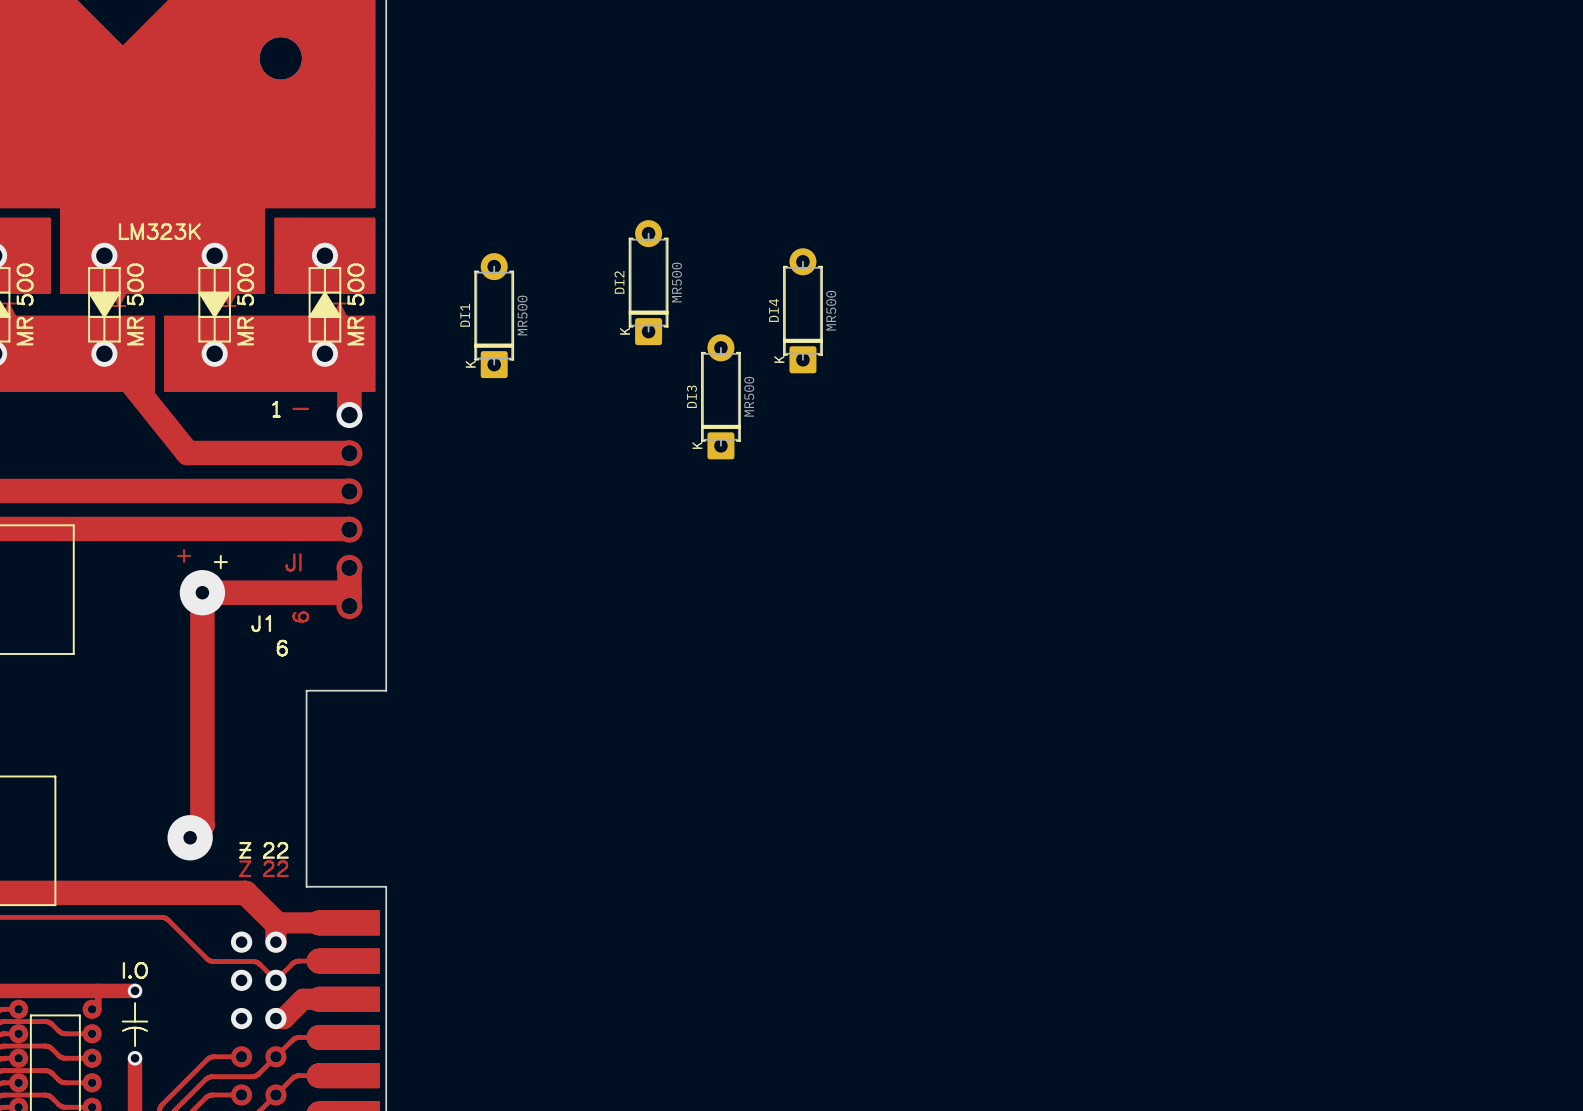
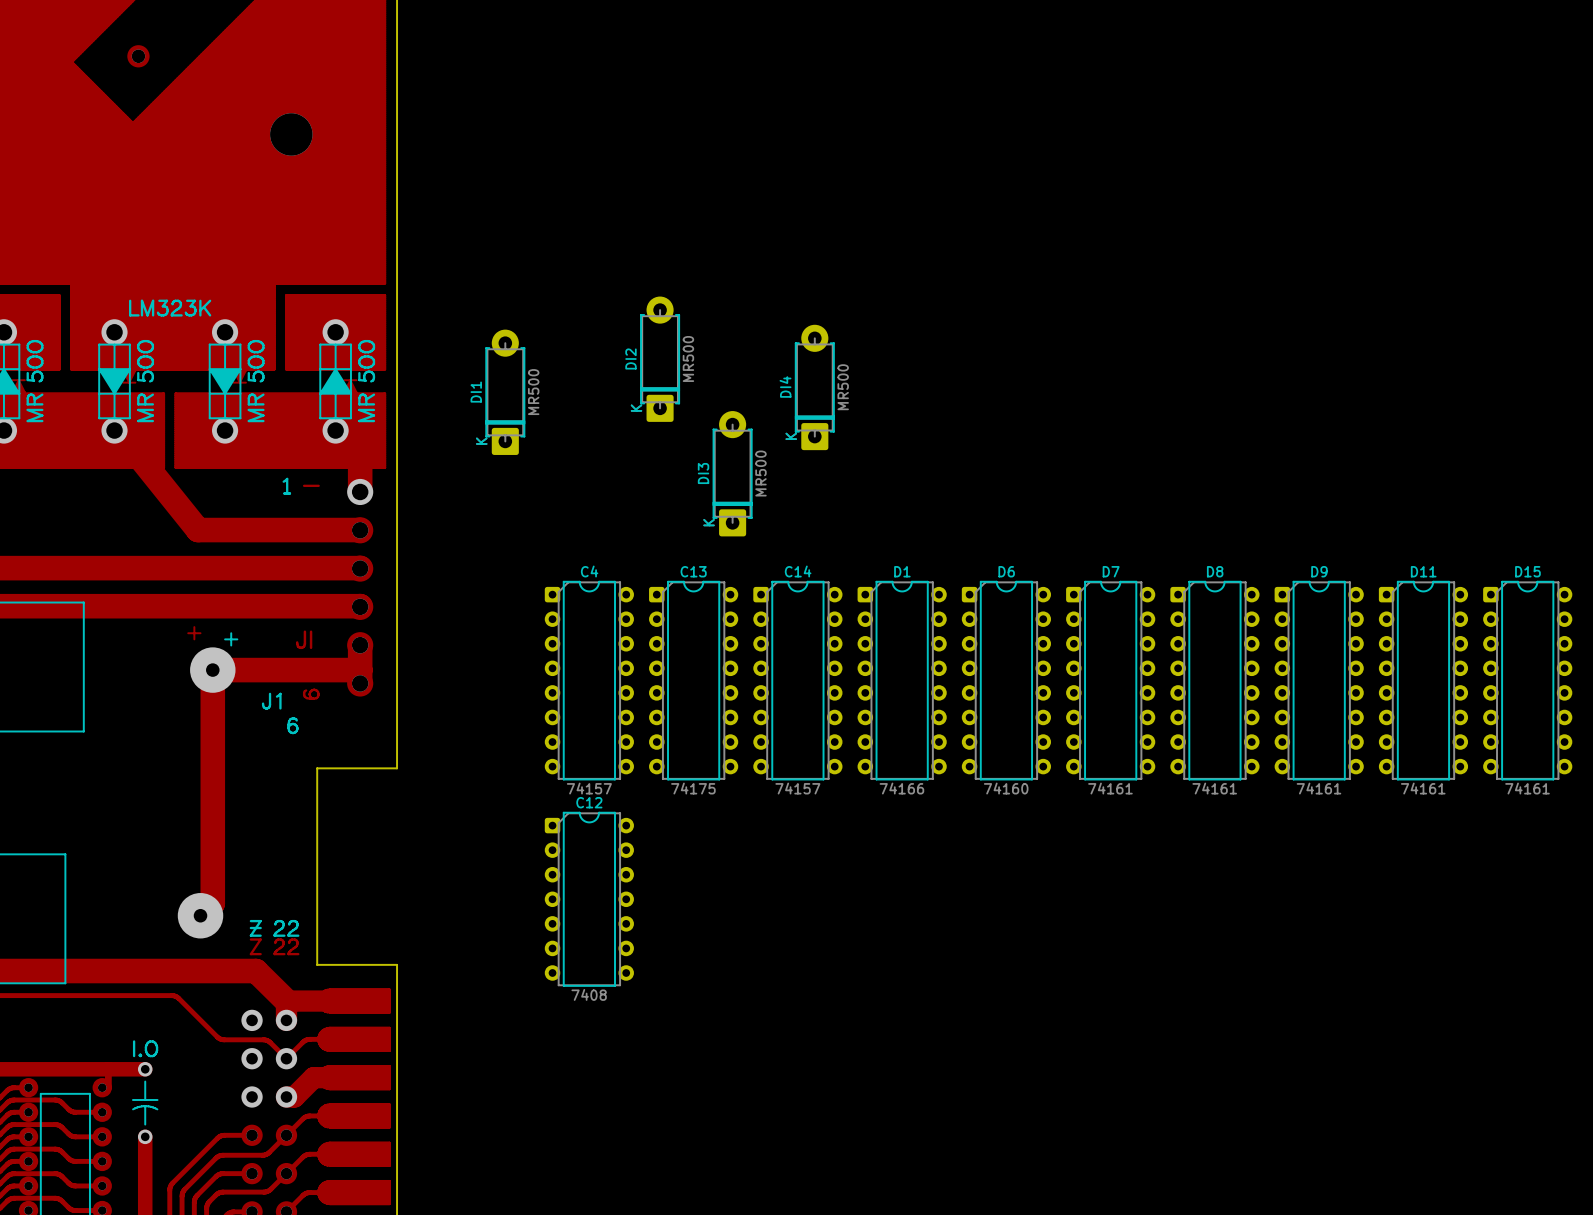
C4: none -> 74157 (589, 680)
C13: none -> 74175 (693, 680)
C14: none -> 74157 (797, 680)
D1: none -> 74166 (902, 680)
D6: none -> 74160 (1006, 680)
D7: none -> 74161 (1110, 680)
D8: none -> 74161 (1214, 680)
D9: none -> 74161 (1319, 680)
D11: none -> 74161 (1423, 680)
D15: none -> 74161 (1527, 680)
C12: none -> 7408 (589, 899)

